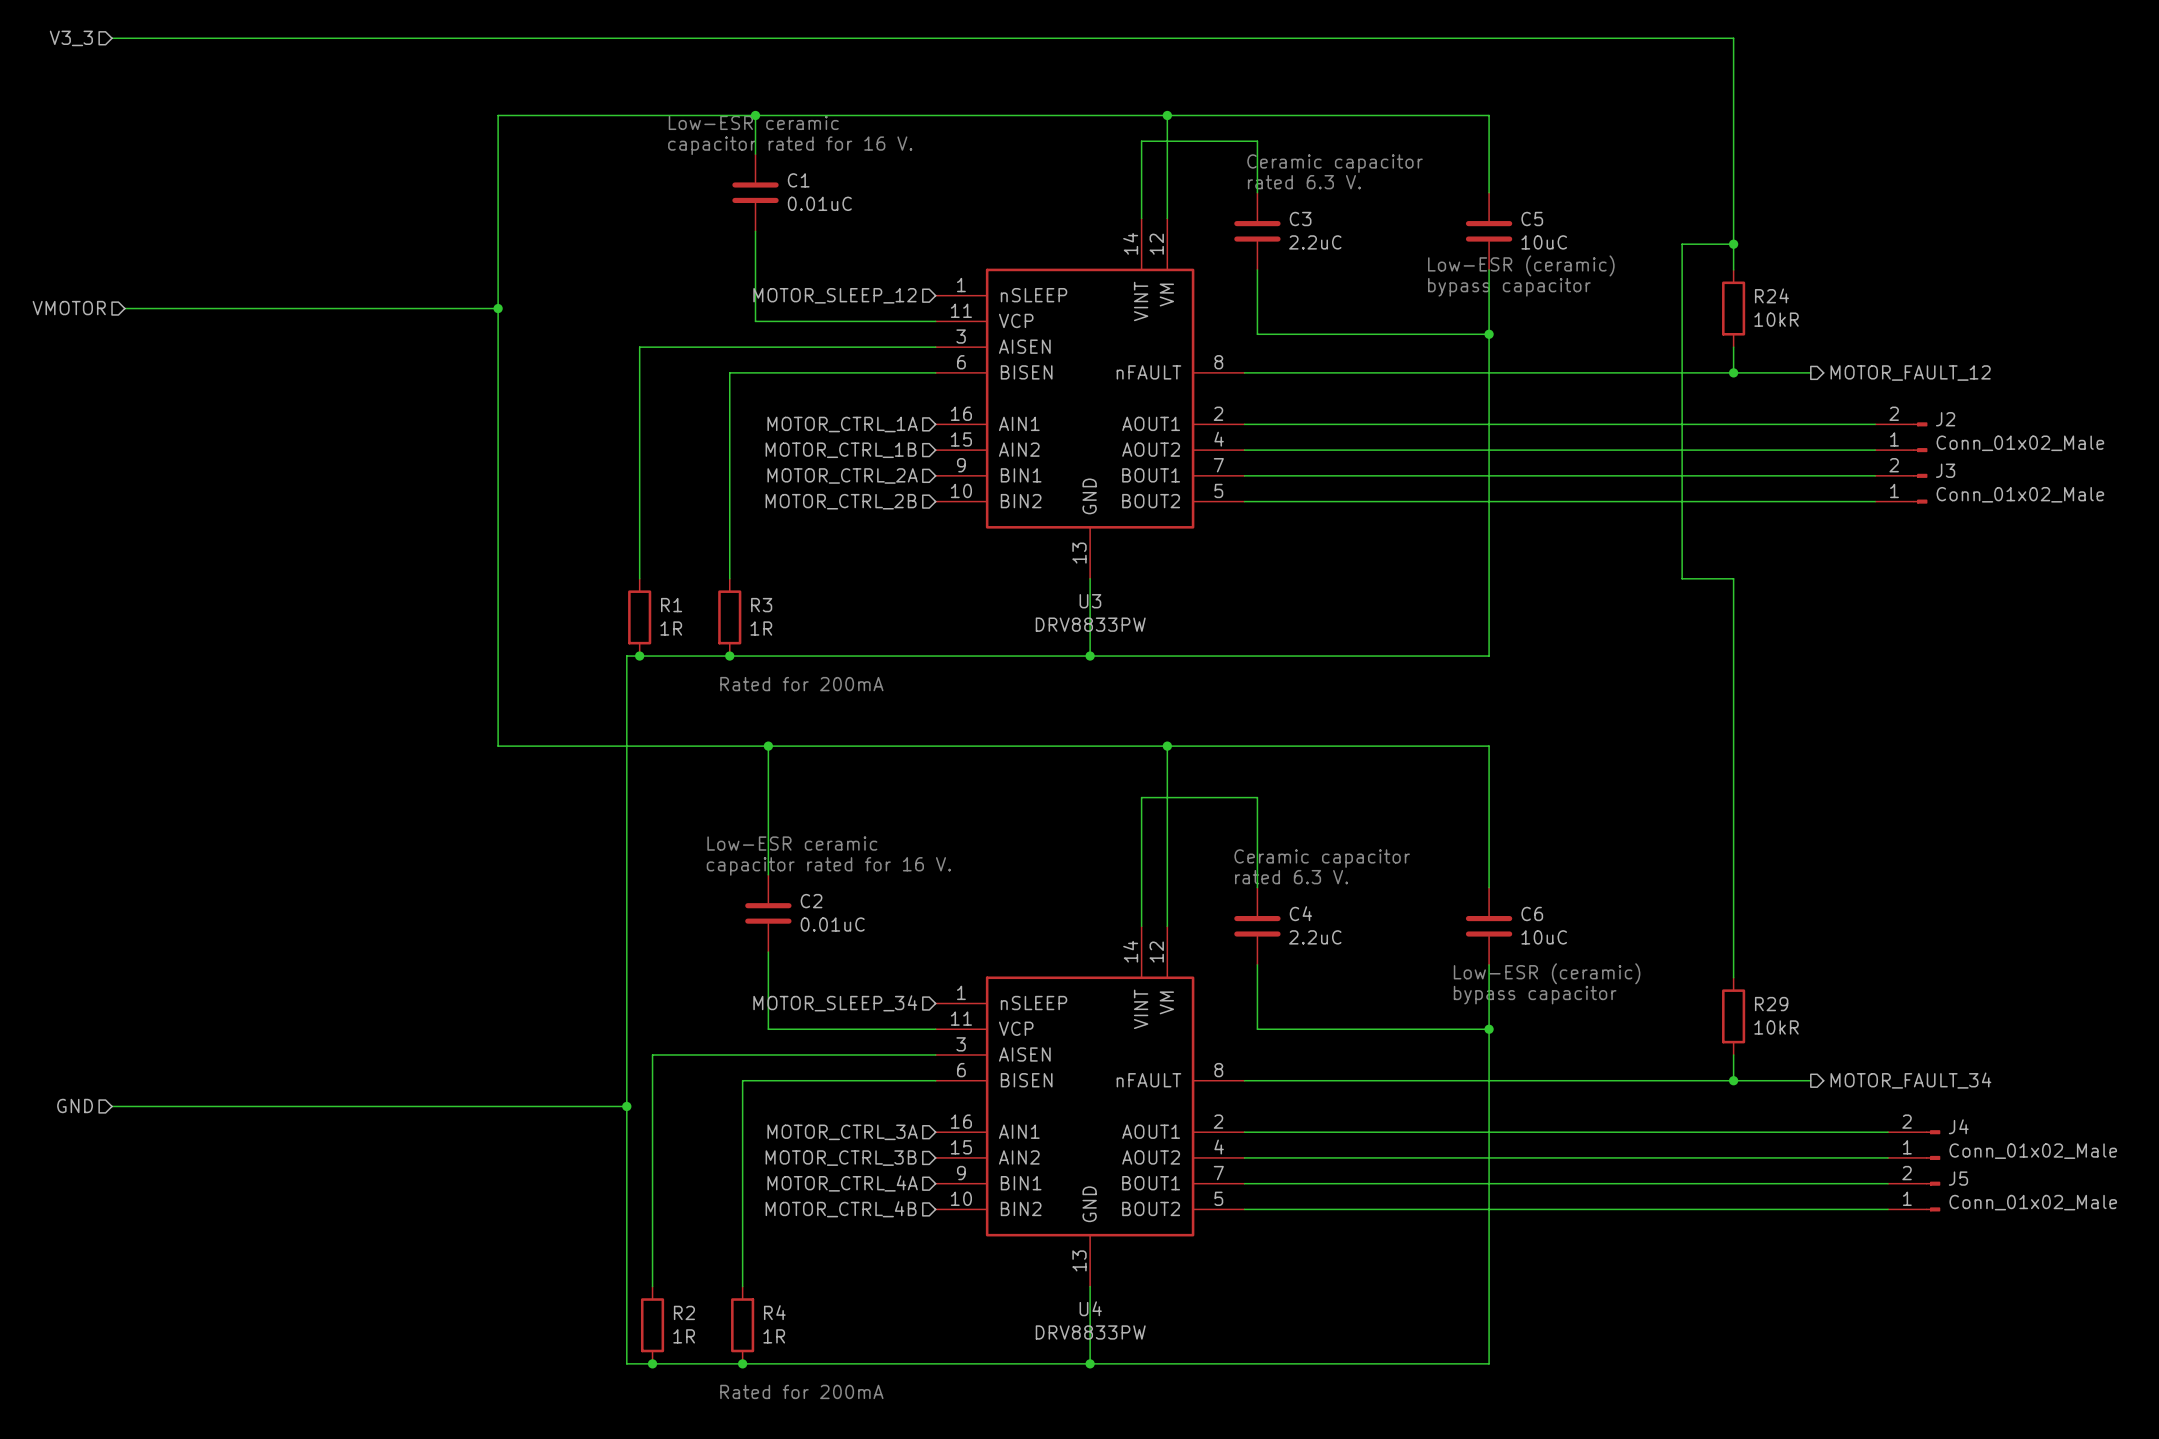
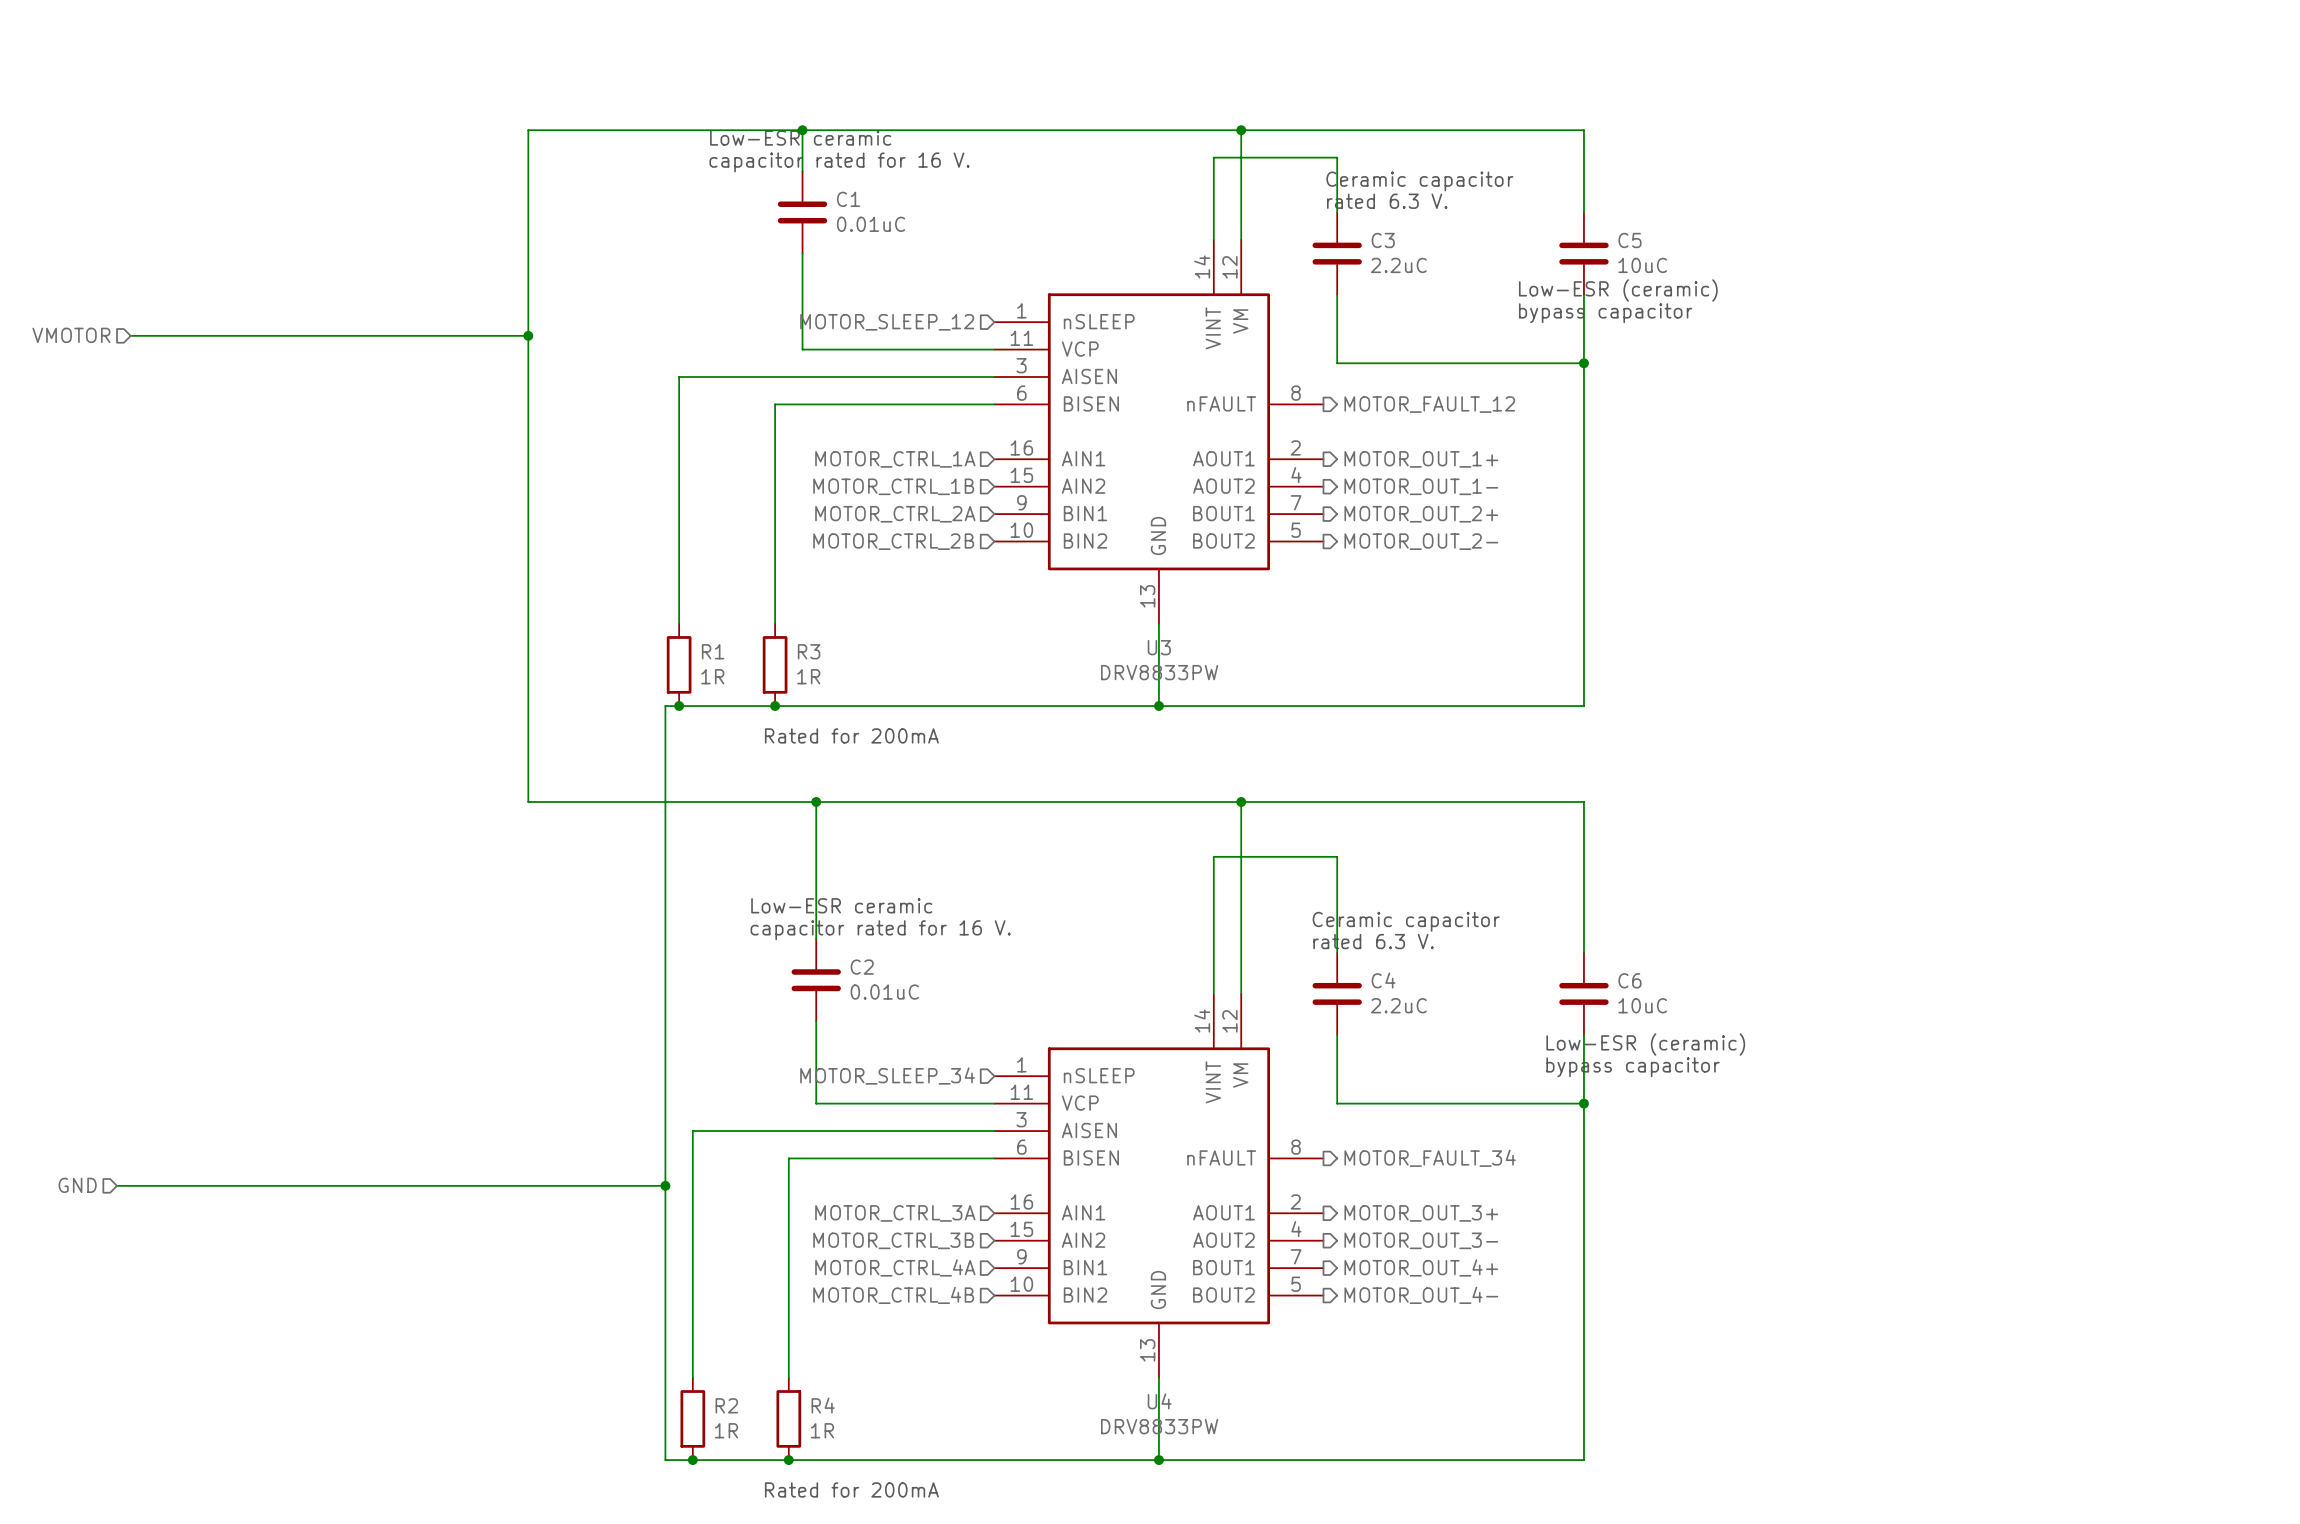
hierarchical label: V3_3 (71, 38) -> none
wire: (112, 38) (1733, 38) (1733, 269) -> none
wire: (1733, 244) (1682, 244) (1682, 578) (1733, 578) (1733, 977) -> none
junction: (1733, 244) -> none
R24: 10kR (1733, 308) -> none
wire: (1733, 347) (1733, 372) -> none
wire: (1244, 372) (1810, 372) -> none
junction: (1733, 372) -> none
hierarchical label: none -> MOTOR_FAULT_12 (1429, 404)
hierarchical label: MOTOR_FAULT_12 (1910, 373) -> none
wire: (1244, 424) (1875, 424) -> none
hierarchical label: none -> MOTOR_OUT_1+ (1421, 459)
J2: Conn_01x02_Male (1901, 437) -> none
wire: (1244, 450) (1875, 450) -> none
hierarchical label: none -> MOTOR_OUT_1- (1421, 486)
wire: (1244, 475) (1875, 475) -> none
hierarchical label: none -> MOTOR_OUT_2+ (1421, 514)
J3: Conn_01x02_Male (1901, 488) -> none
wire: (1244, 501) (1875, 501) -> none
hierarchical label: none -> MOTOR_OUT_2- (1421, 541)
R29: 10kR (1733, 1016) -> none
wire: (1733, 1054) (1733, 1080) -> none
wire: (1244, 1080) (1810, 1080) -> none
hierarchical label: none -> MOTOR_FAULT_34 (1430, 1158)
junction: (1733, 1080) -> none
hierarchical label: MOTOR_FAULT_34 (1910, 1080) -> none
wire: (1244, 1132) (1888, 1132) -> none
hierarchical label: none -> MOTOR_OUT_3+ (1421, 1213)
J4: Conn_01x02_Male (1914, 1145) -> none
wire: (1244, 1157) (1888, 1157) -> none
hierarchical label: none -> MOTOR_OUT_3- (1421, 1240)
wire: (1244, 1183) (1888, 1183) -> none
hierarchical label: none -> MOTOR_OUT_4+ (1421, 1267)
J5: Conn_01x02_Male (1914, 1196) -> none
wire: (1244, 1209) (1888, 1209) -> none
hierarchical label: none -> MOTOR_OUT_4- (1421, 1295)

